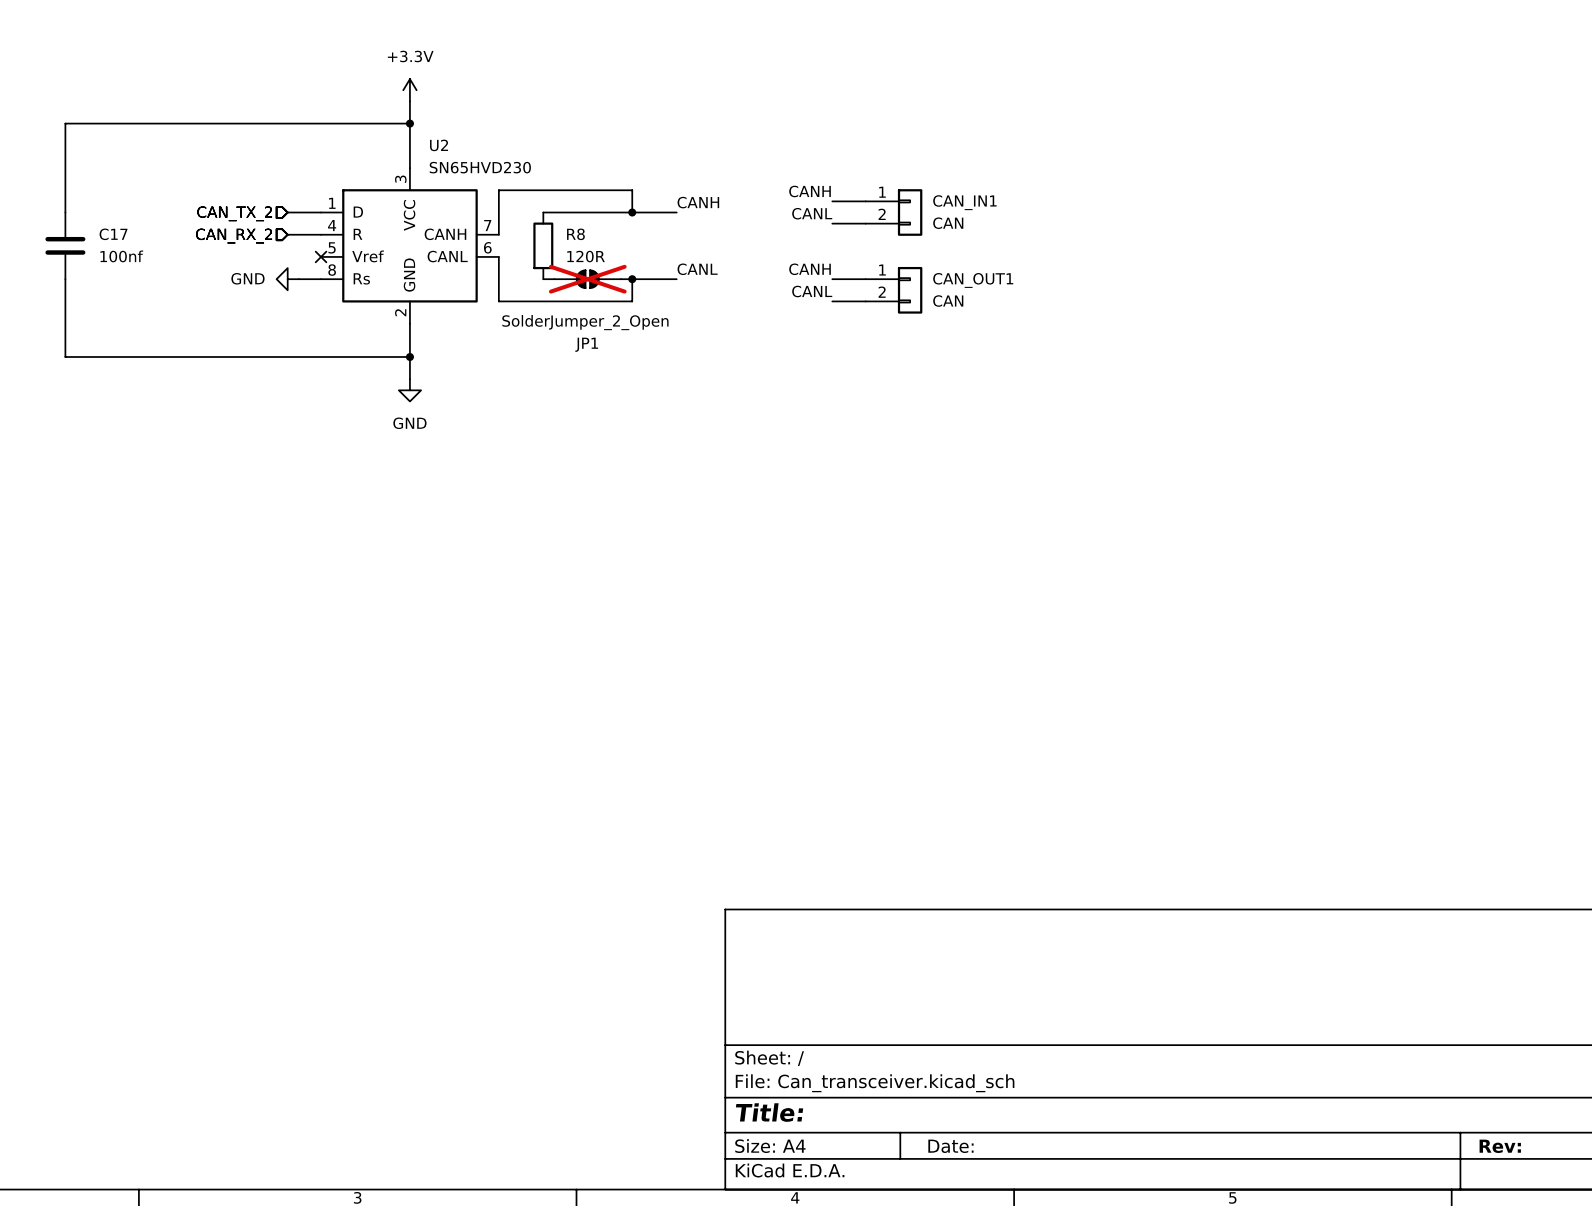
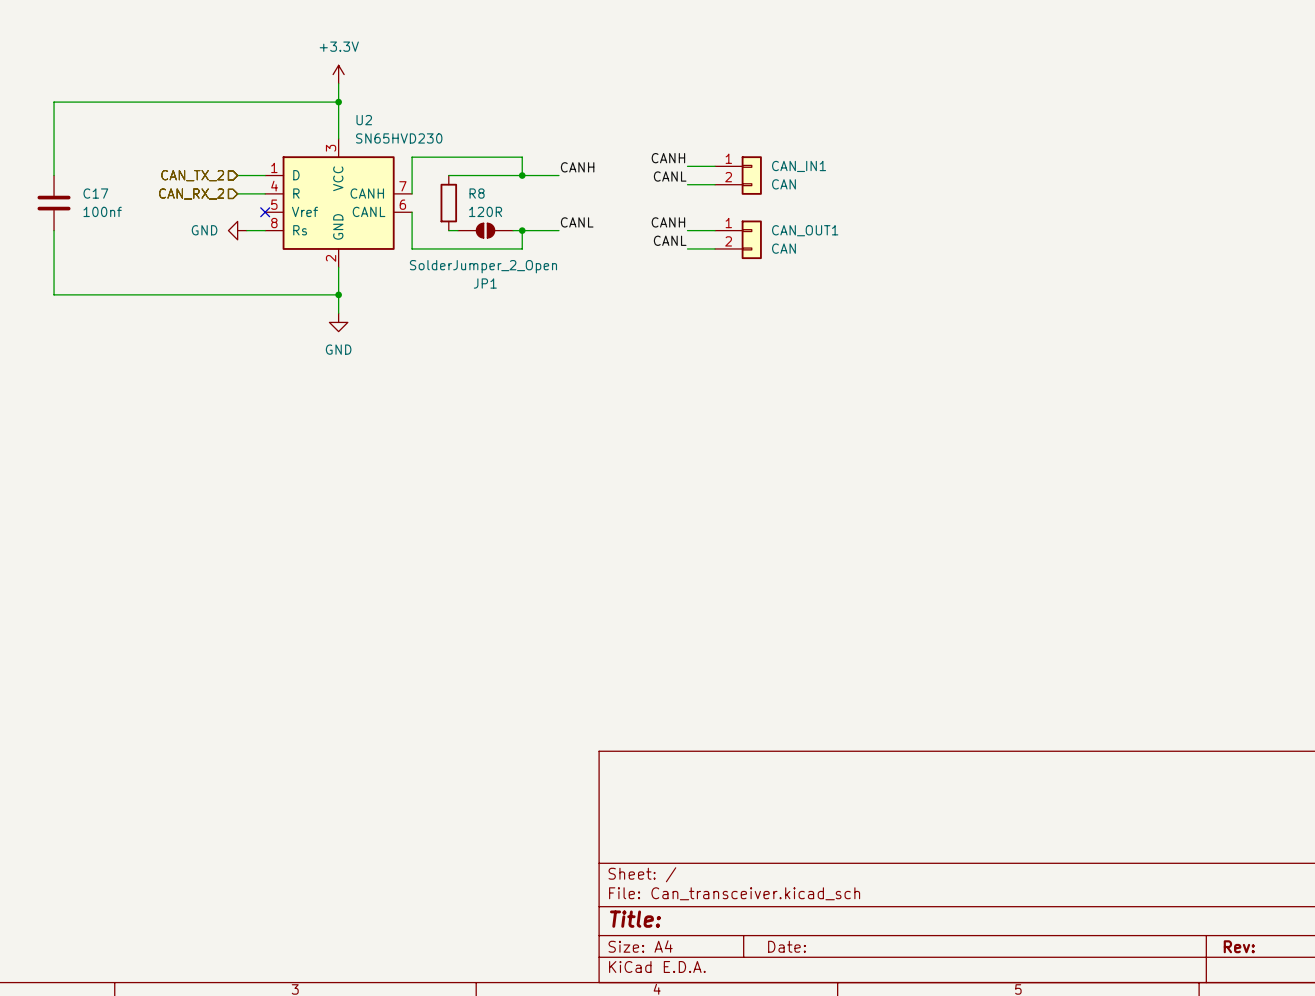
JP1 do-not-place cross: (587, 279) -> none

